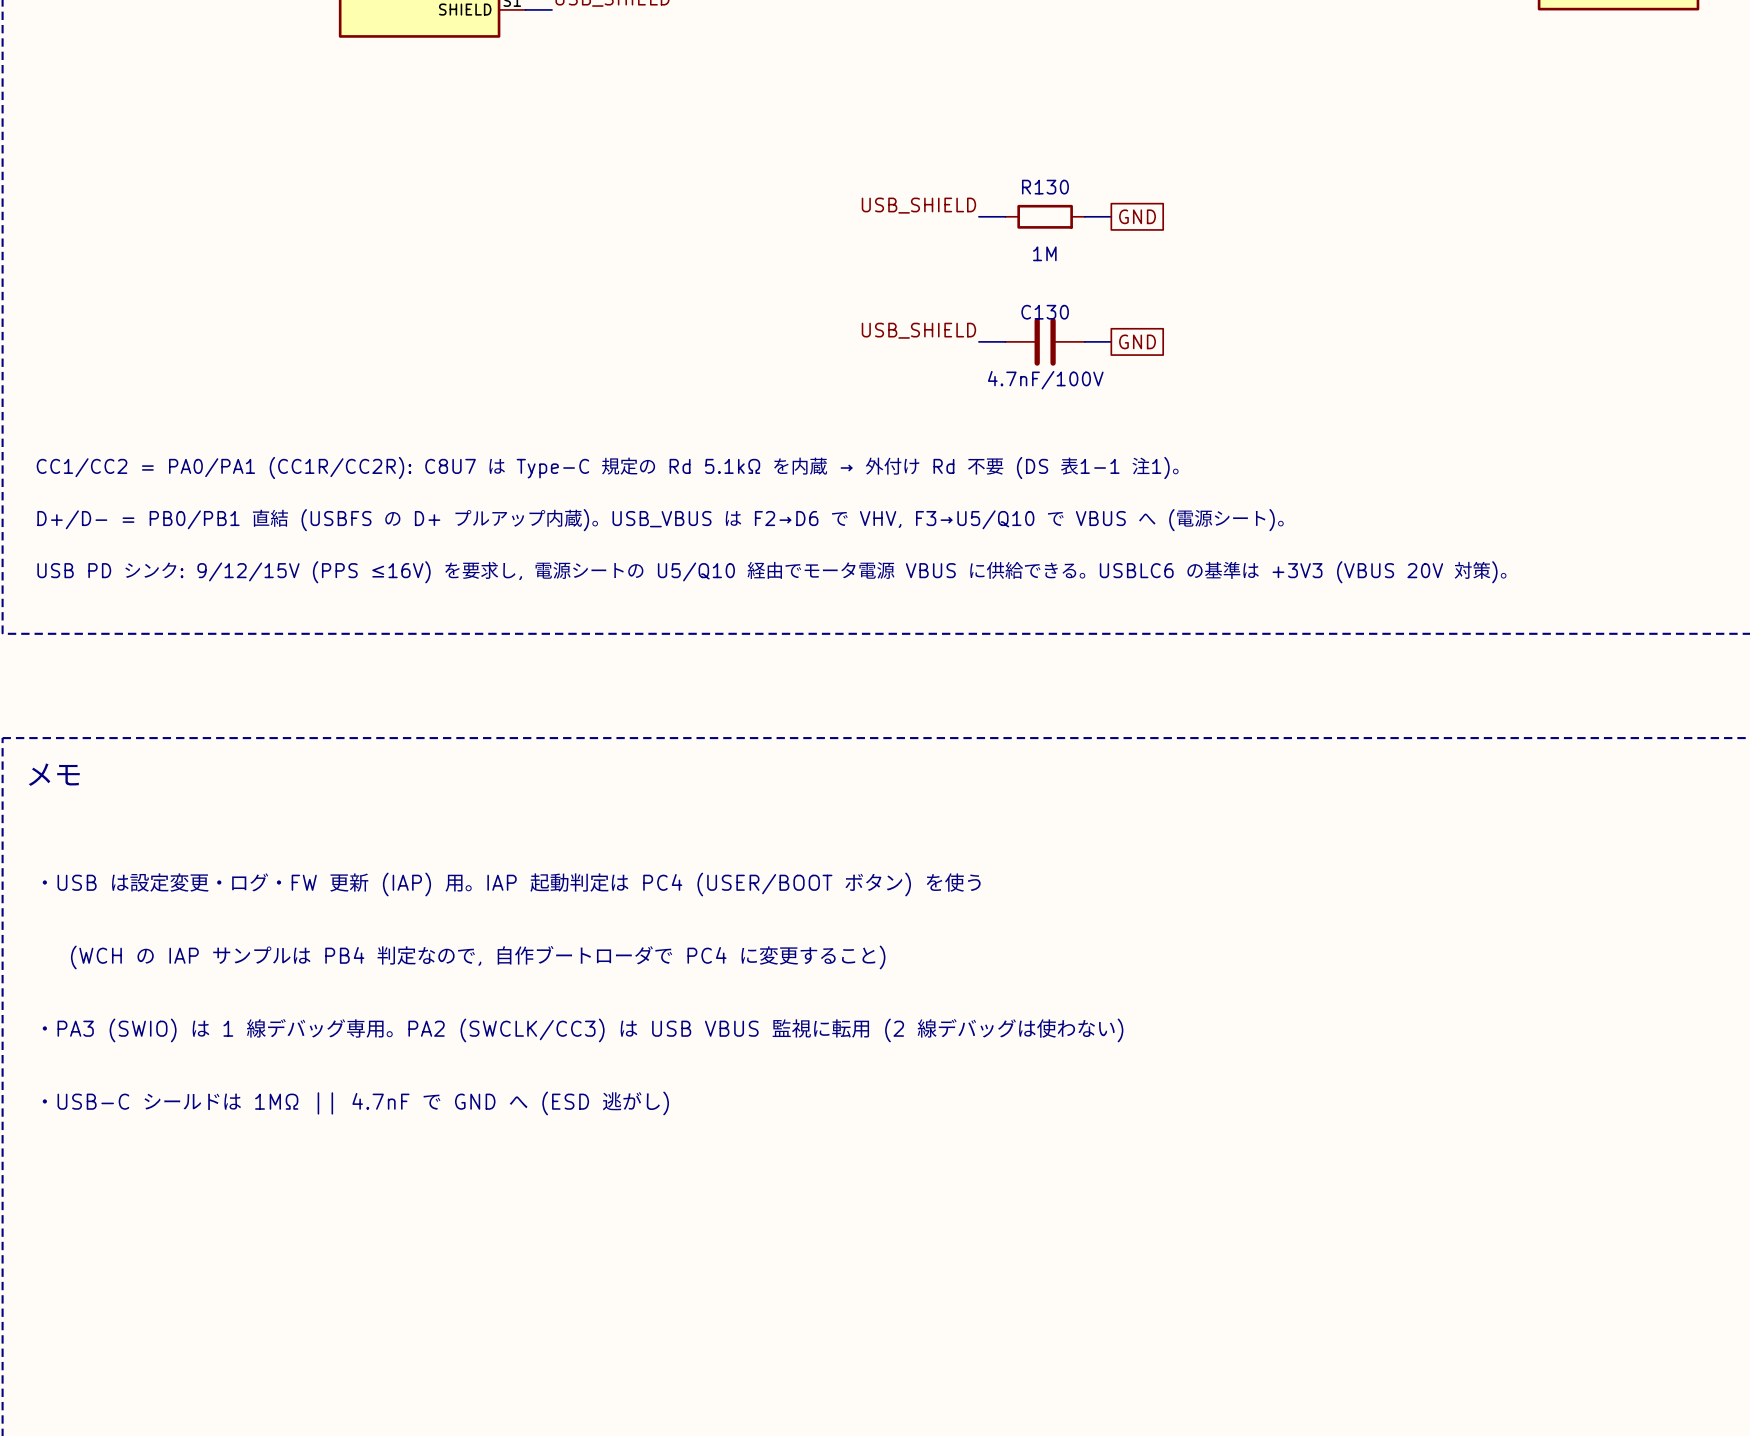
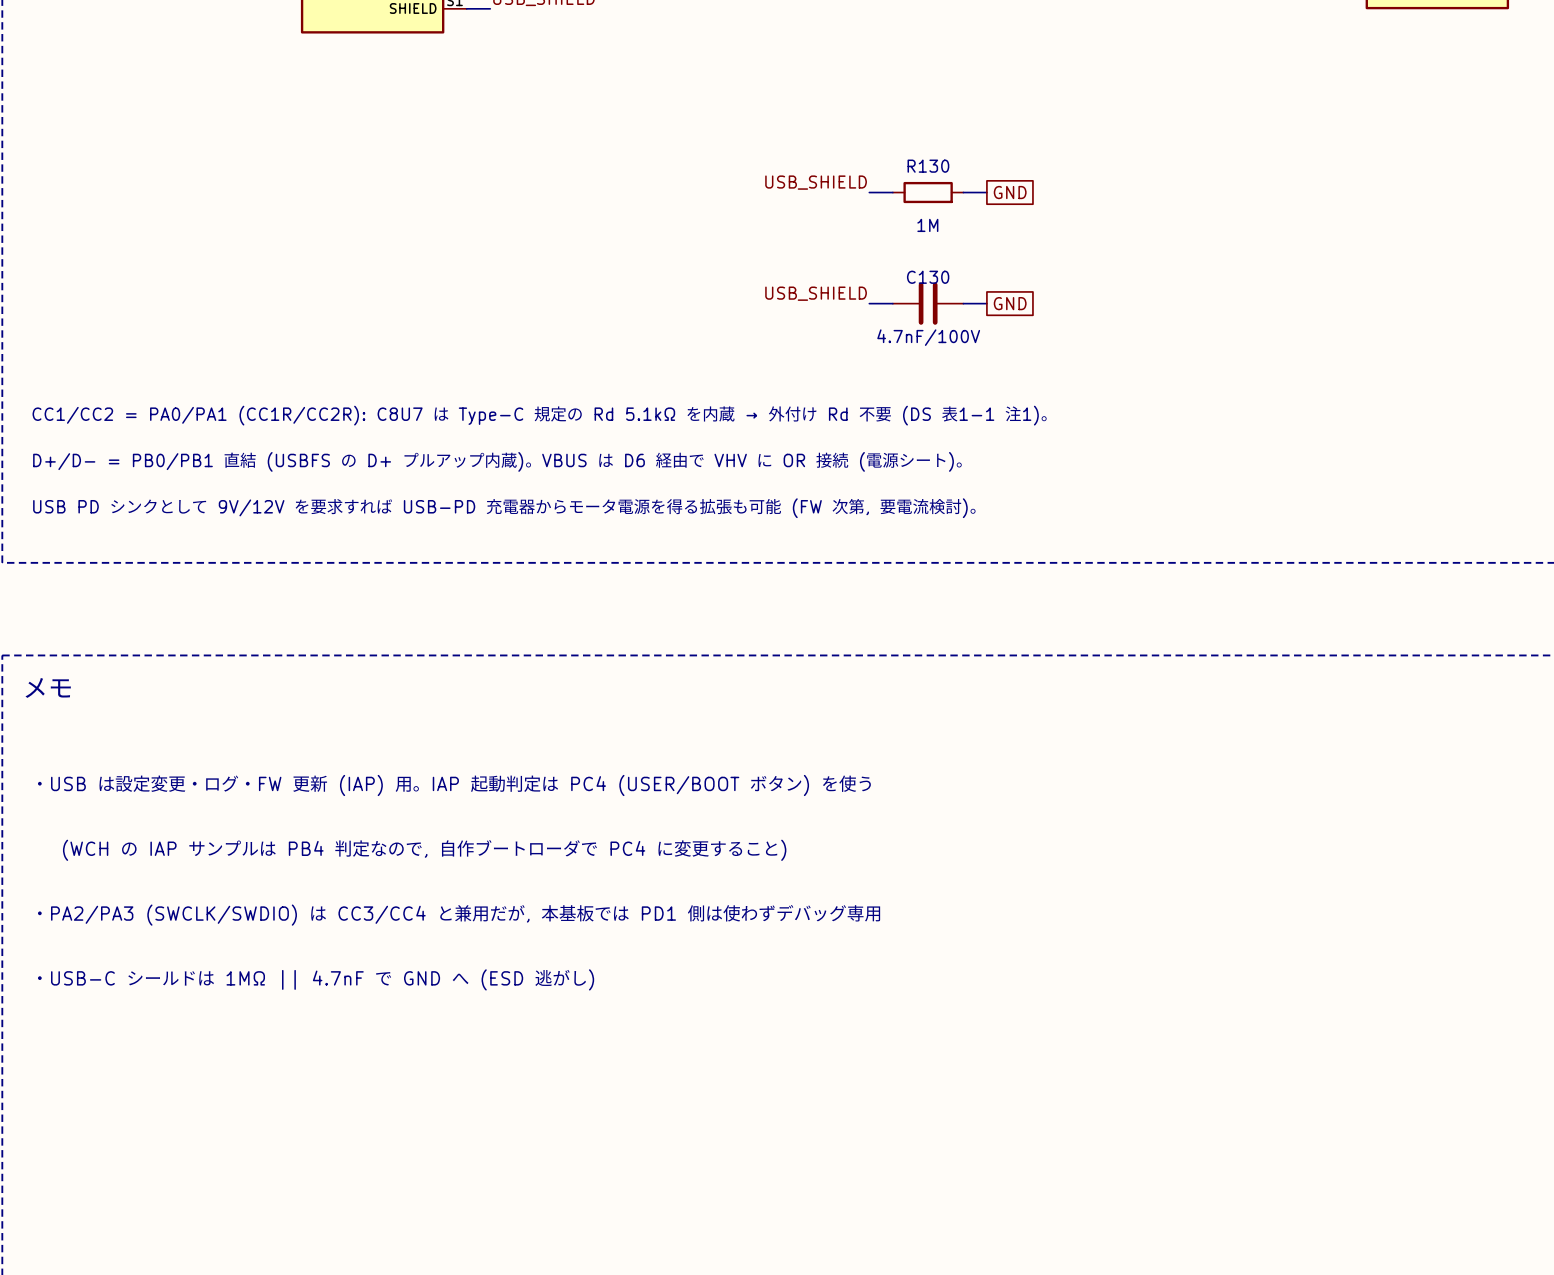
text: D+/D- = PB0/PB1 直結 (USBFS の D+ プルアップ内蔵)。USB_VBUS は F2→D6 で VHV, F3→U5/Q10 で VBUS へ (電源シート)。 (660, 520) -> D+/D- = PB0/PB1 直結 (USBFS の D+ プルアップ内蔵)。VBUS は D6 経由で VHV に OR 接続 (電源シート)。 (497, 461)
text: USB PD シンク: 9/12/15V (PPS ≤16V) を要求し, 電源シートの U5/Q10 経由でモータ電源 VBUS に供給できる。USBLC6 の基準は +3V3 (VBUS 20V 対策)。 (772, 572) -> USB PD シンクとして 9V/12V を要求すれば USB-PD 充電器からモータ電源を得る拡張も可能 (FW 次第, 要電流検討)。 (504, 508)
text: ・PA3 (SWIO) は 1 線デバッグ専用。PA2 (SWCLK/CC3) は USB VBUS 監視に転用 (2 線デバッグは使わない) (582, 1030) -> ・PA2/PA3 (SWCLK/SWDIO) は CC3/CC4 と兼用だが, 本基板では PD1 側は使わずデバッグ専用 (459, 914)

